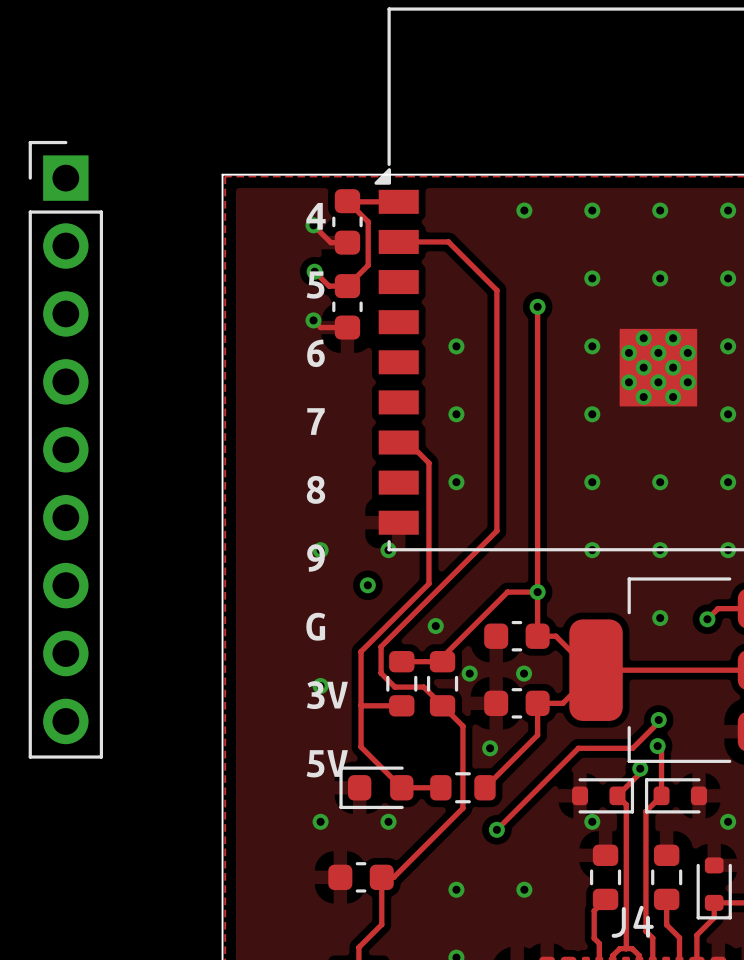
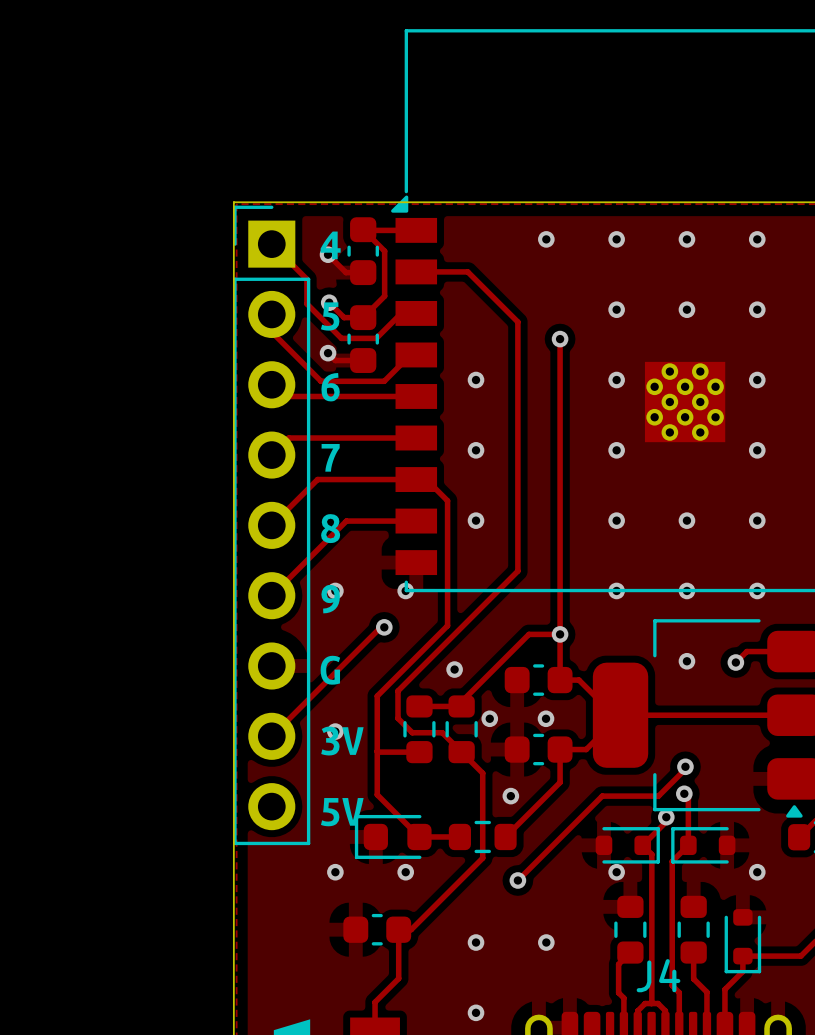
track: none -> (271, 244) (306, 279) (306, 303) (341, 338) (376, 338) (401, 313)
track: none -> (271, 314) (271, 332) (321, 381) (384, 381) (410, 354)
track: none -> (271, 384) (283, 396) (409, 396)
track: none -> (409, 438) (288, 438) (271, 455)
track: none -> (426, 479) (317, 479) (271, 525)
part position: (65, 449) -> (271, 525)
track: none -> (409, 521) (346, 521) (271, 595)
track: none -> (380, 627) (271, 736)

